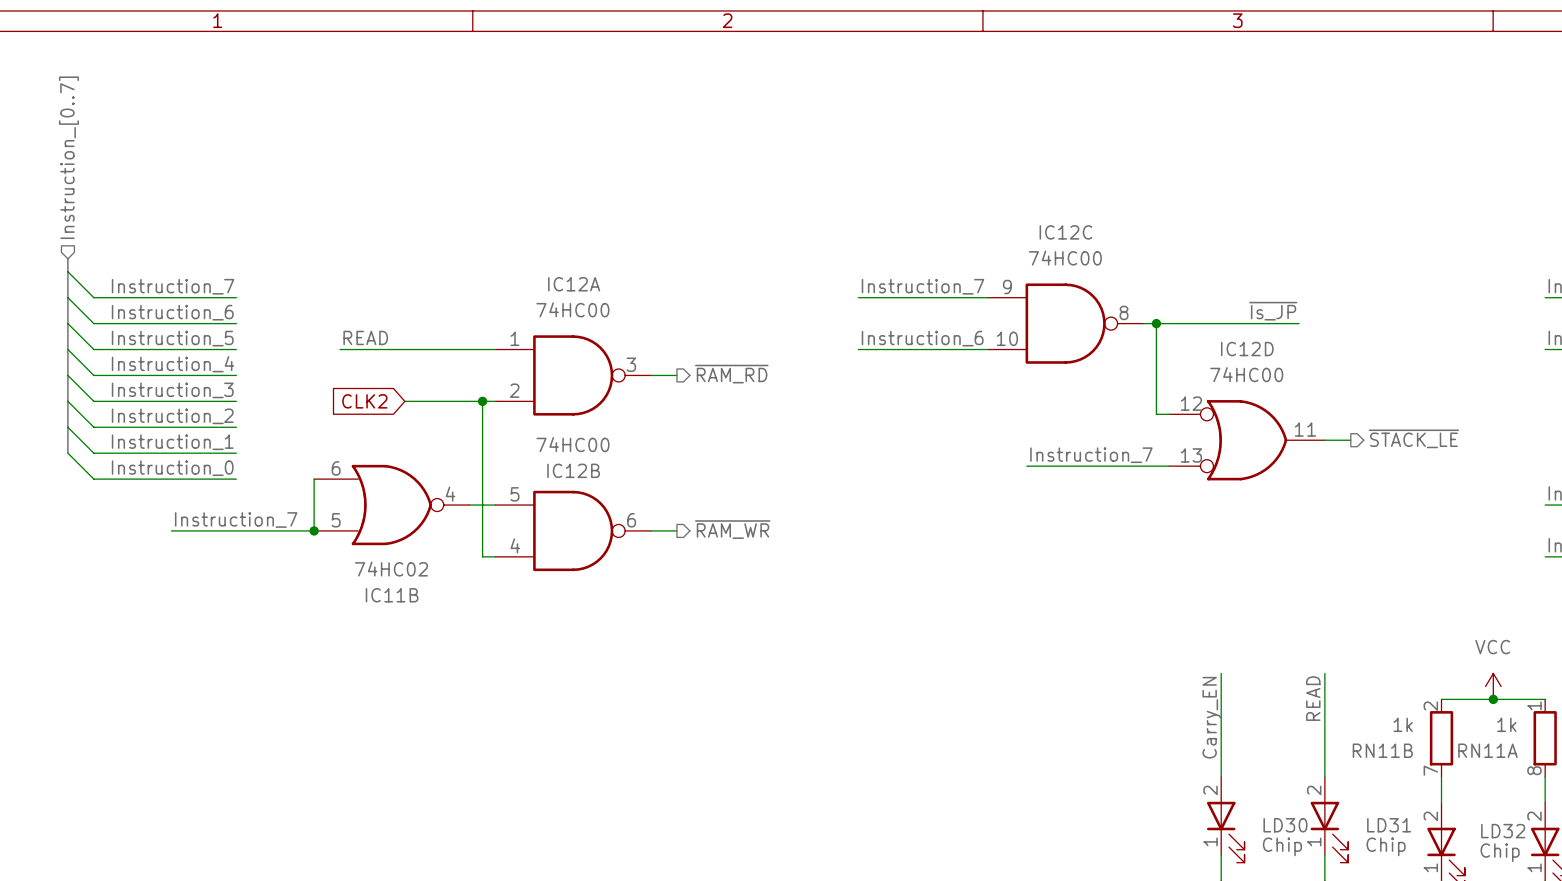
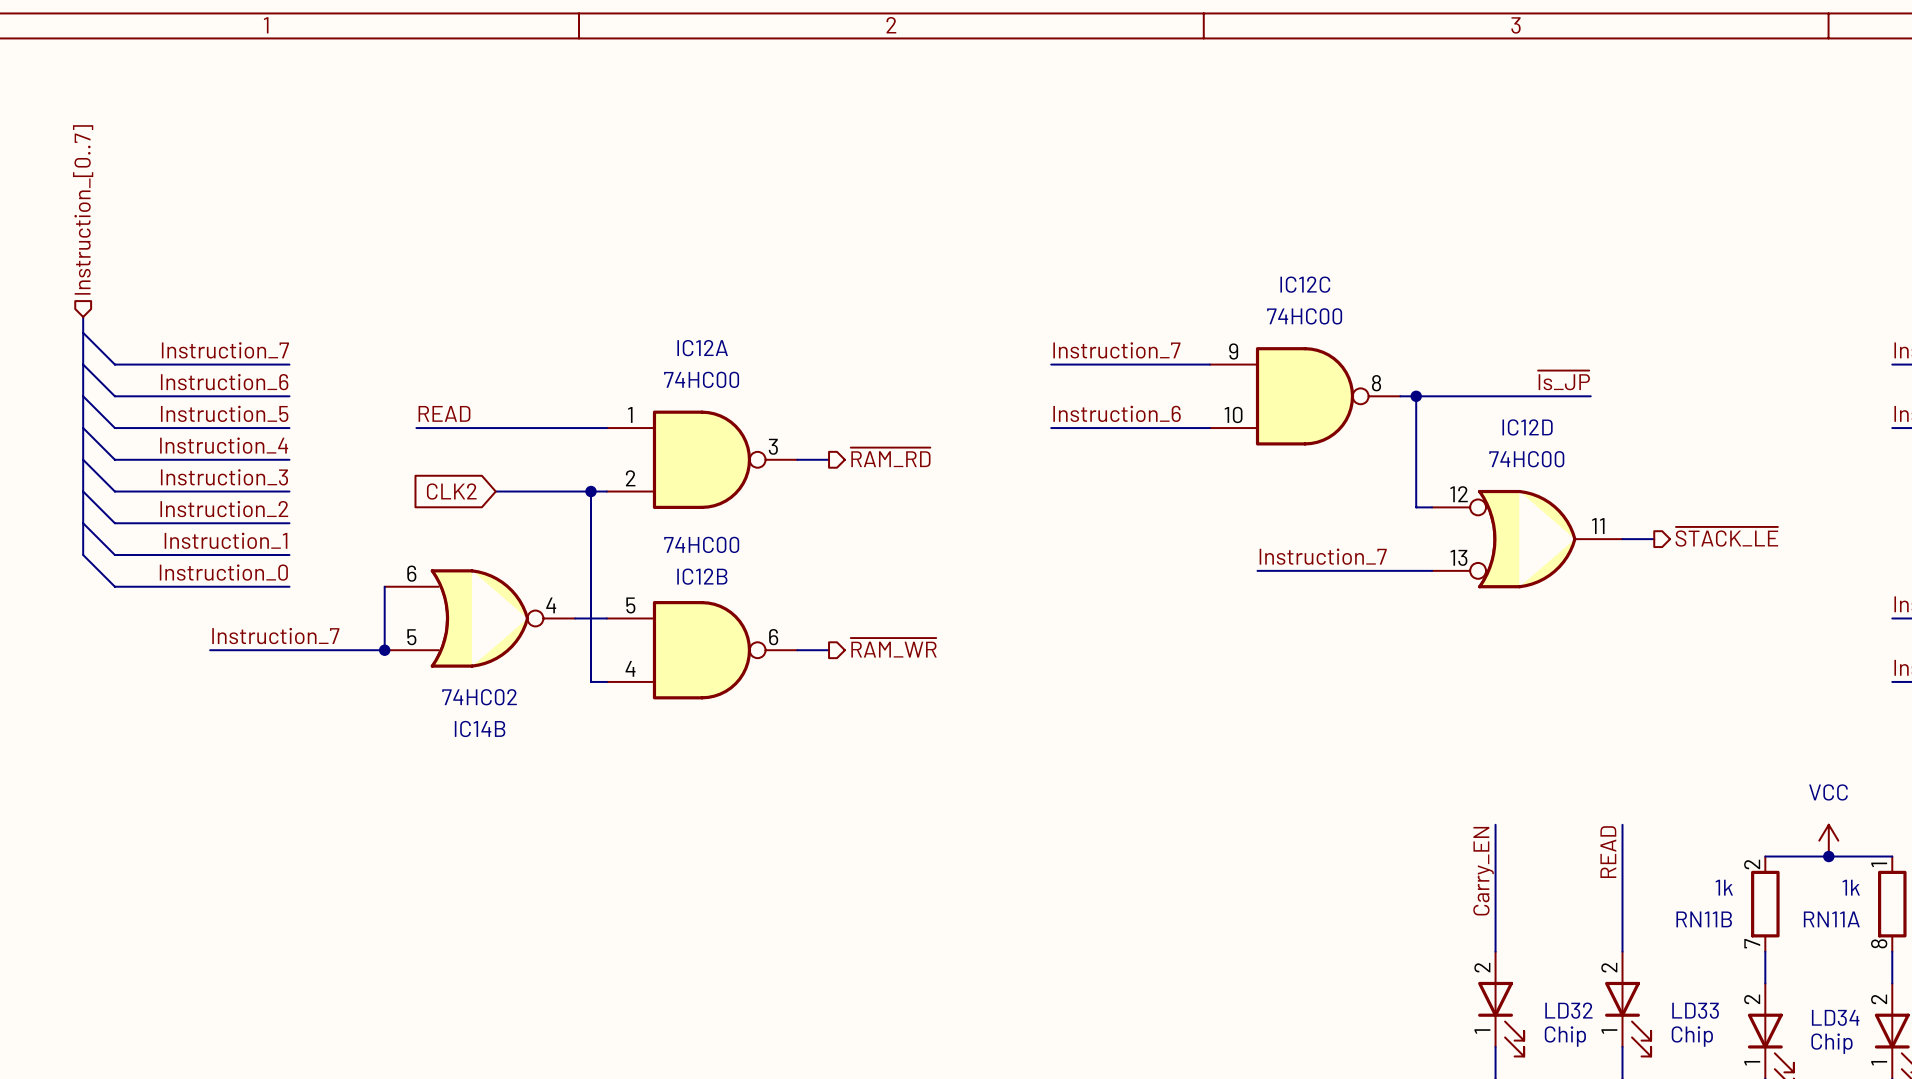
IC11B name: IC11B (392, 595) -> IC14B (480, 728)
LD30 name: LD30 (1285, 825) -> LD32 (1568, 1010)
LD31 name: LD31 (1389, 825) -> LD33 (1695, 1010)
LD32 name: LD32 (1503, 831) -> LD34 (1835, 1017)

